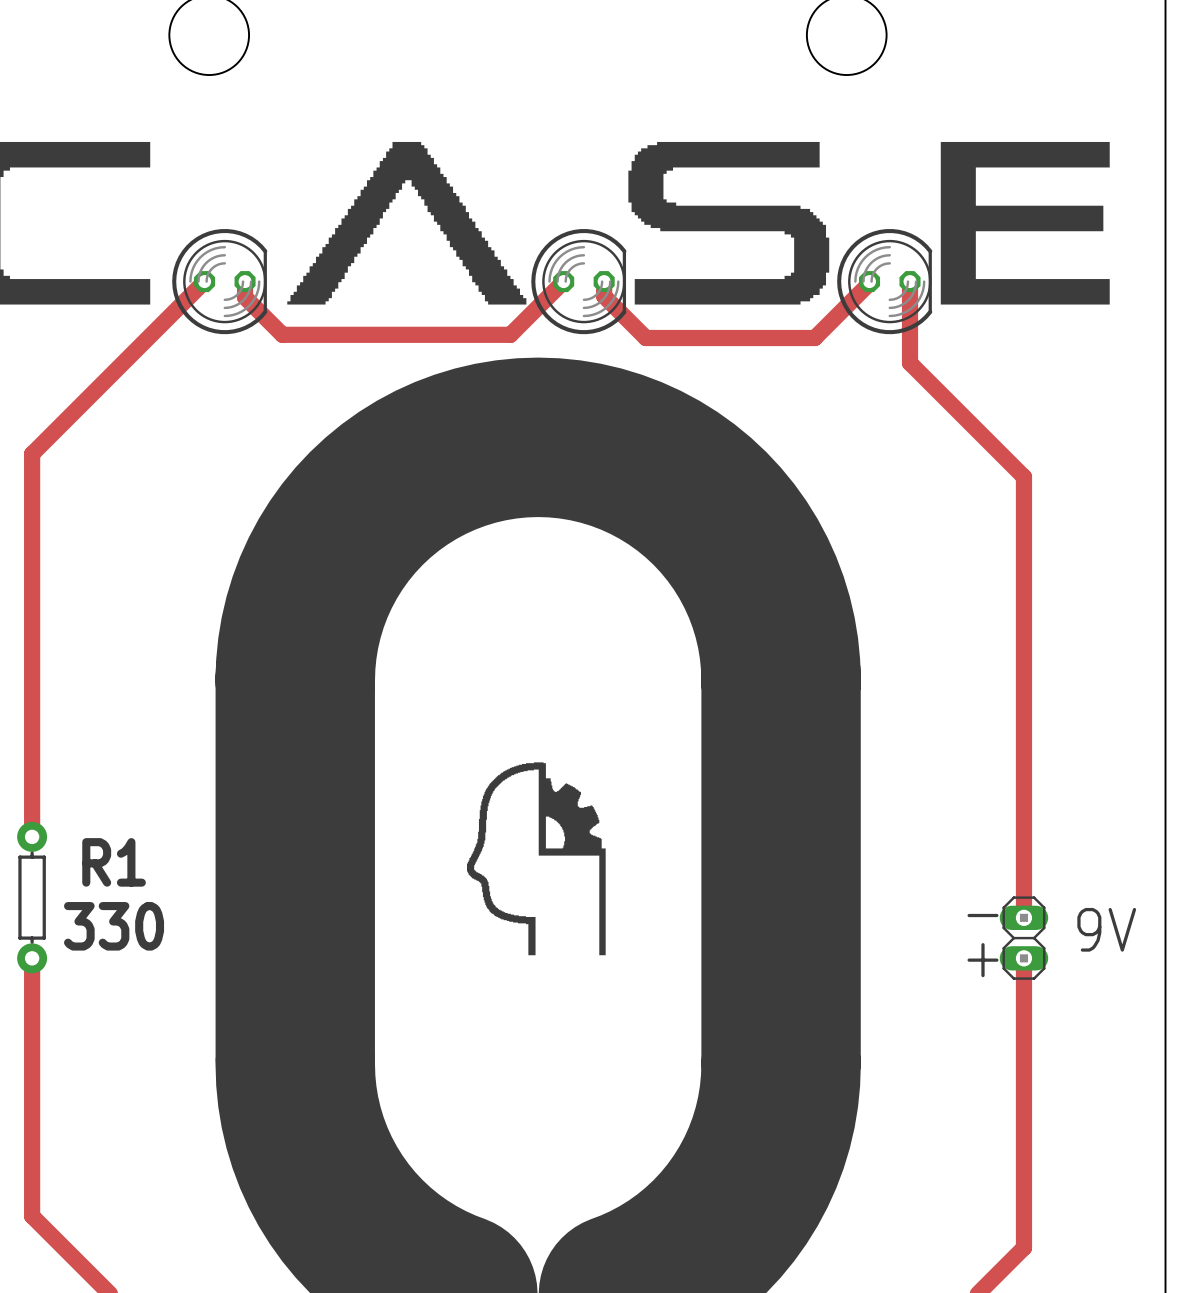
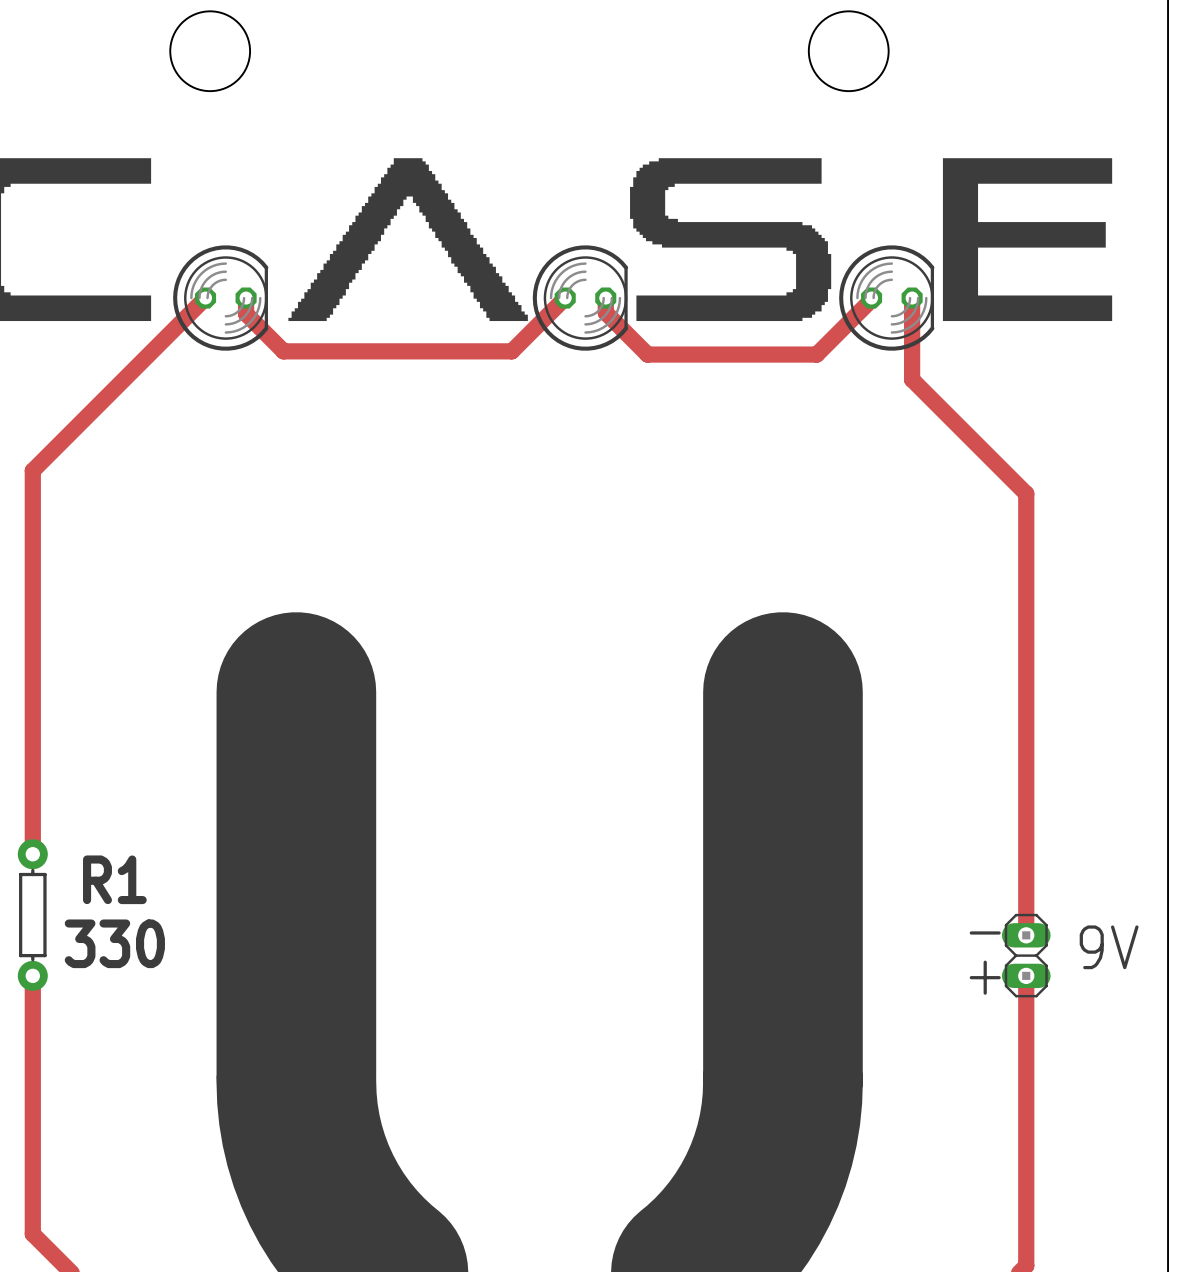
line: (295, 680) (299, 632) (313, 587) (336, 545) (366, 508) (403, 478) (445, 455) (490, 441) (538, 437) (585, 441) (631, 455) (673, 478) (709, 508) (740, 545) (762, 587) (776, 632) (781, 680) -> none
drawing: [467, 762, 606, 956] -> none

